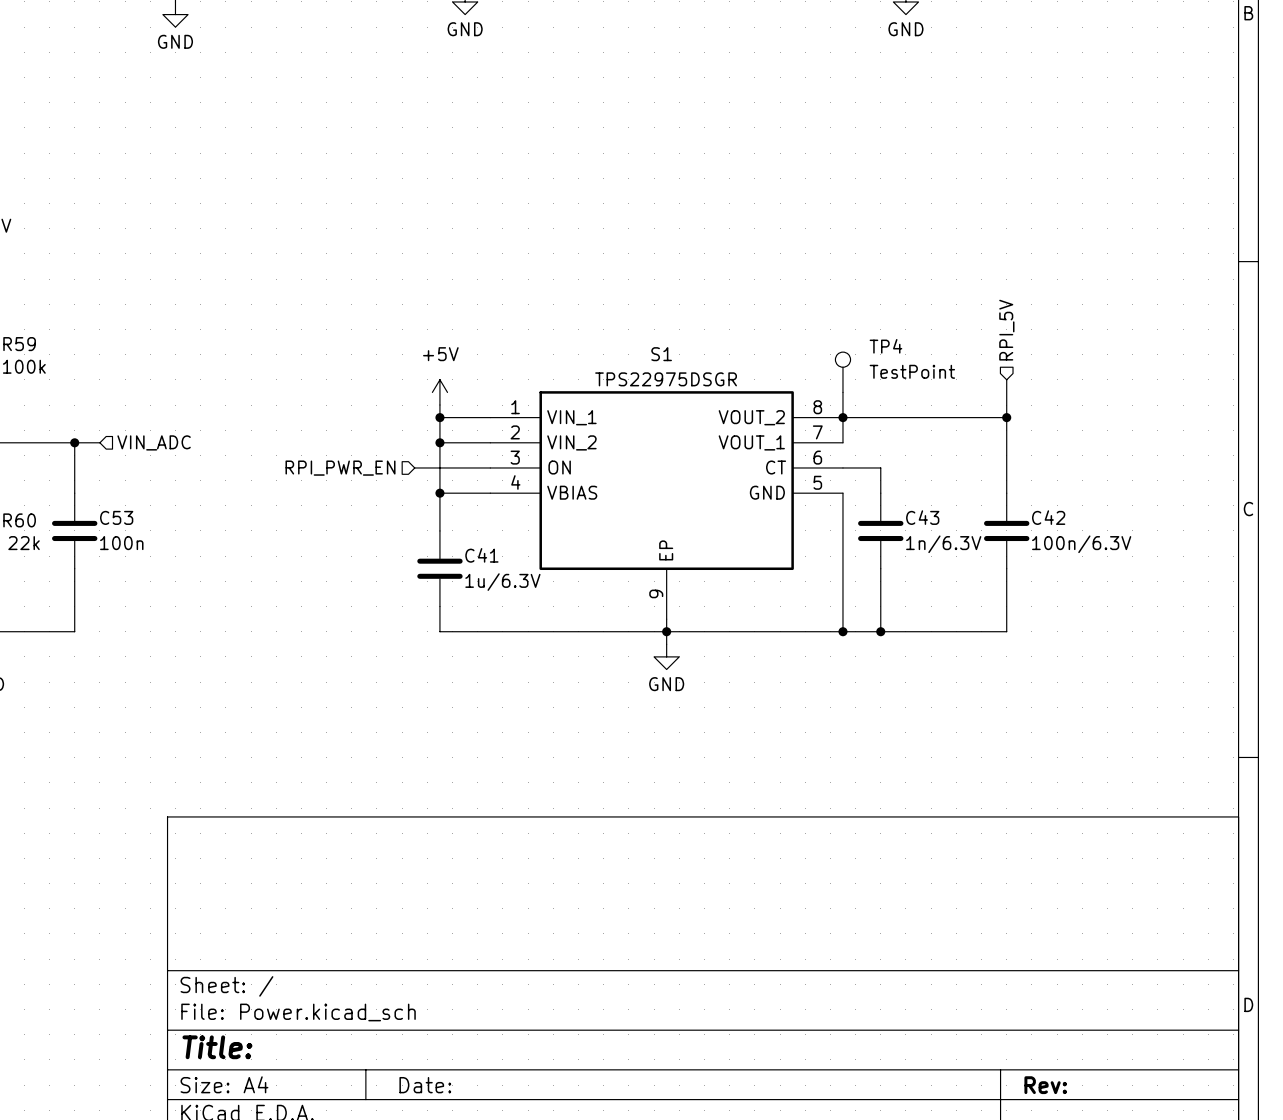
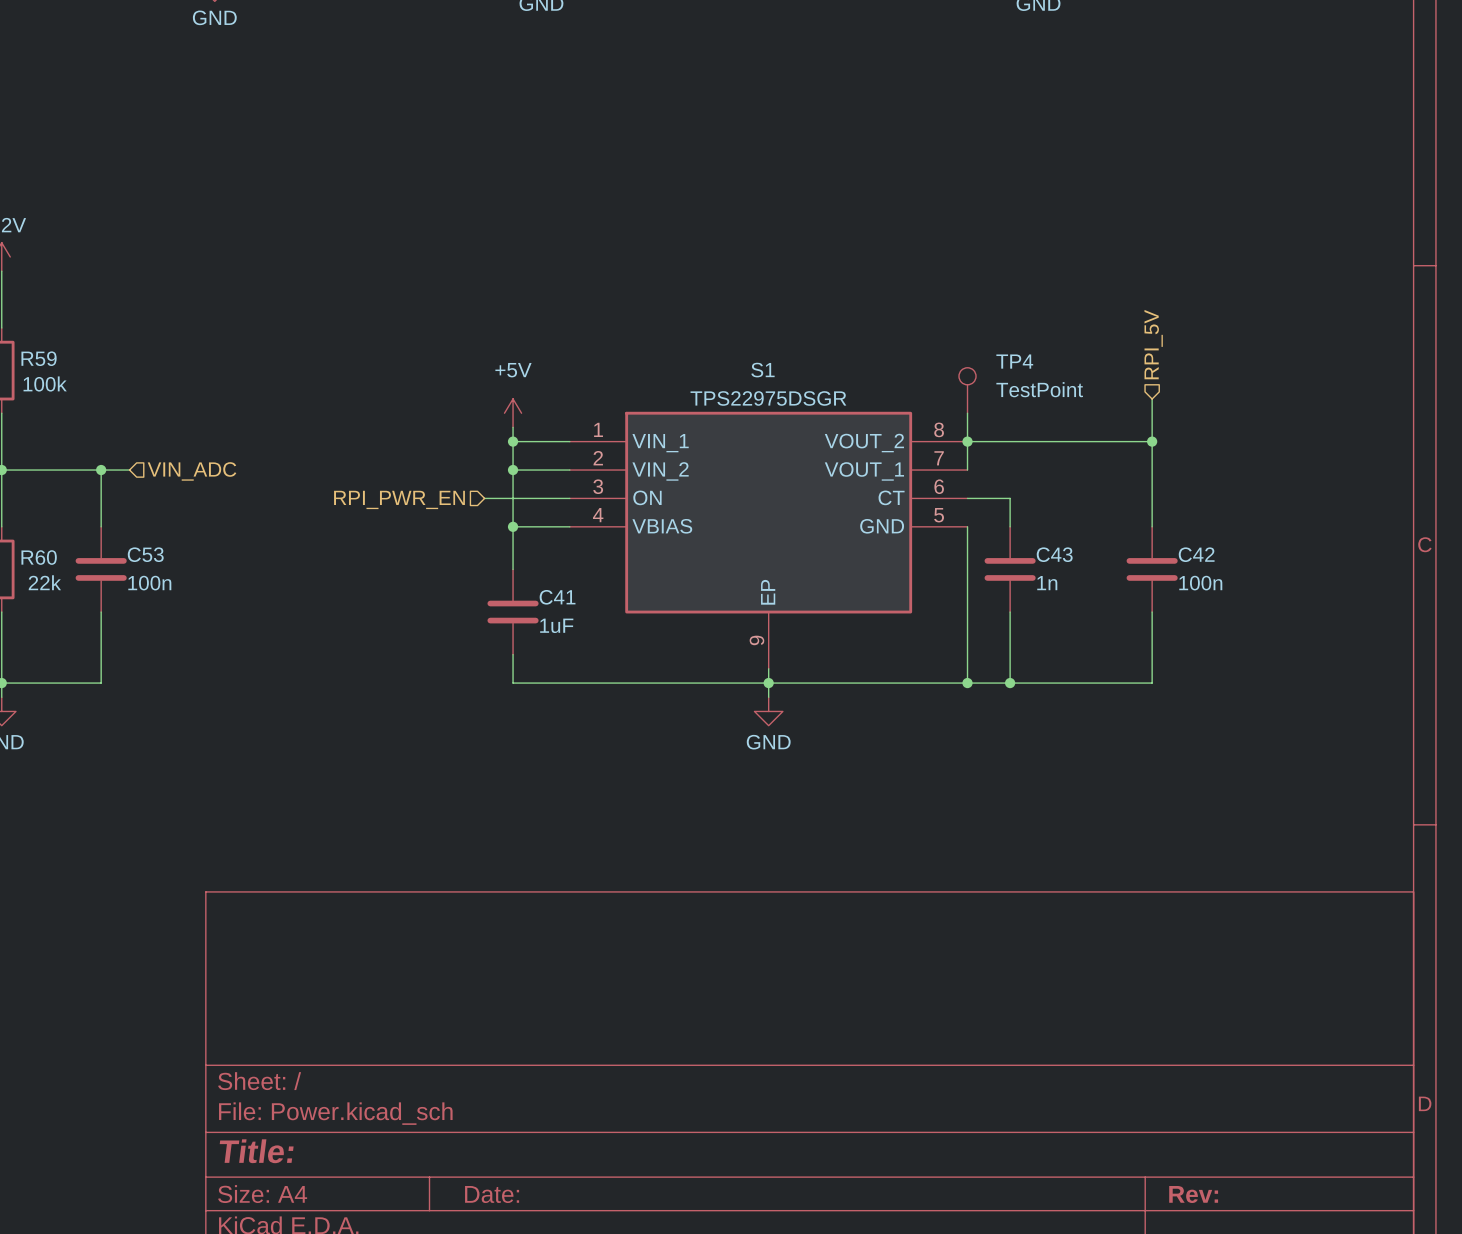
C43 value: 1n/6.3V (943, 544) -> 1n (1047, 583)
C42 value: 100n/6.3V (1081, 544) -> 100n (1200, 583)
C41 value: 1u/6.3V (502, 582) -> 1uF (556, 625)

